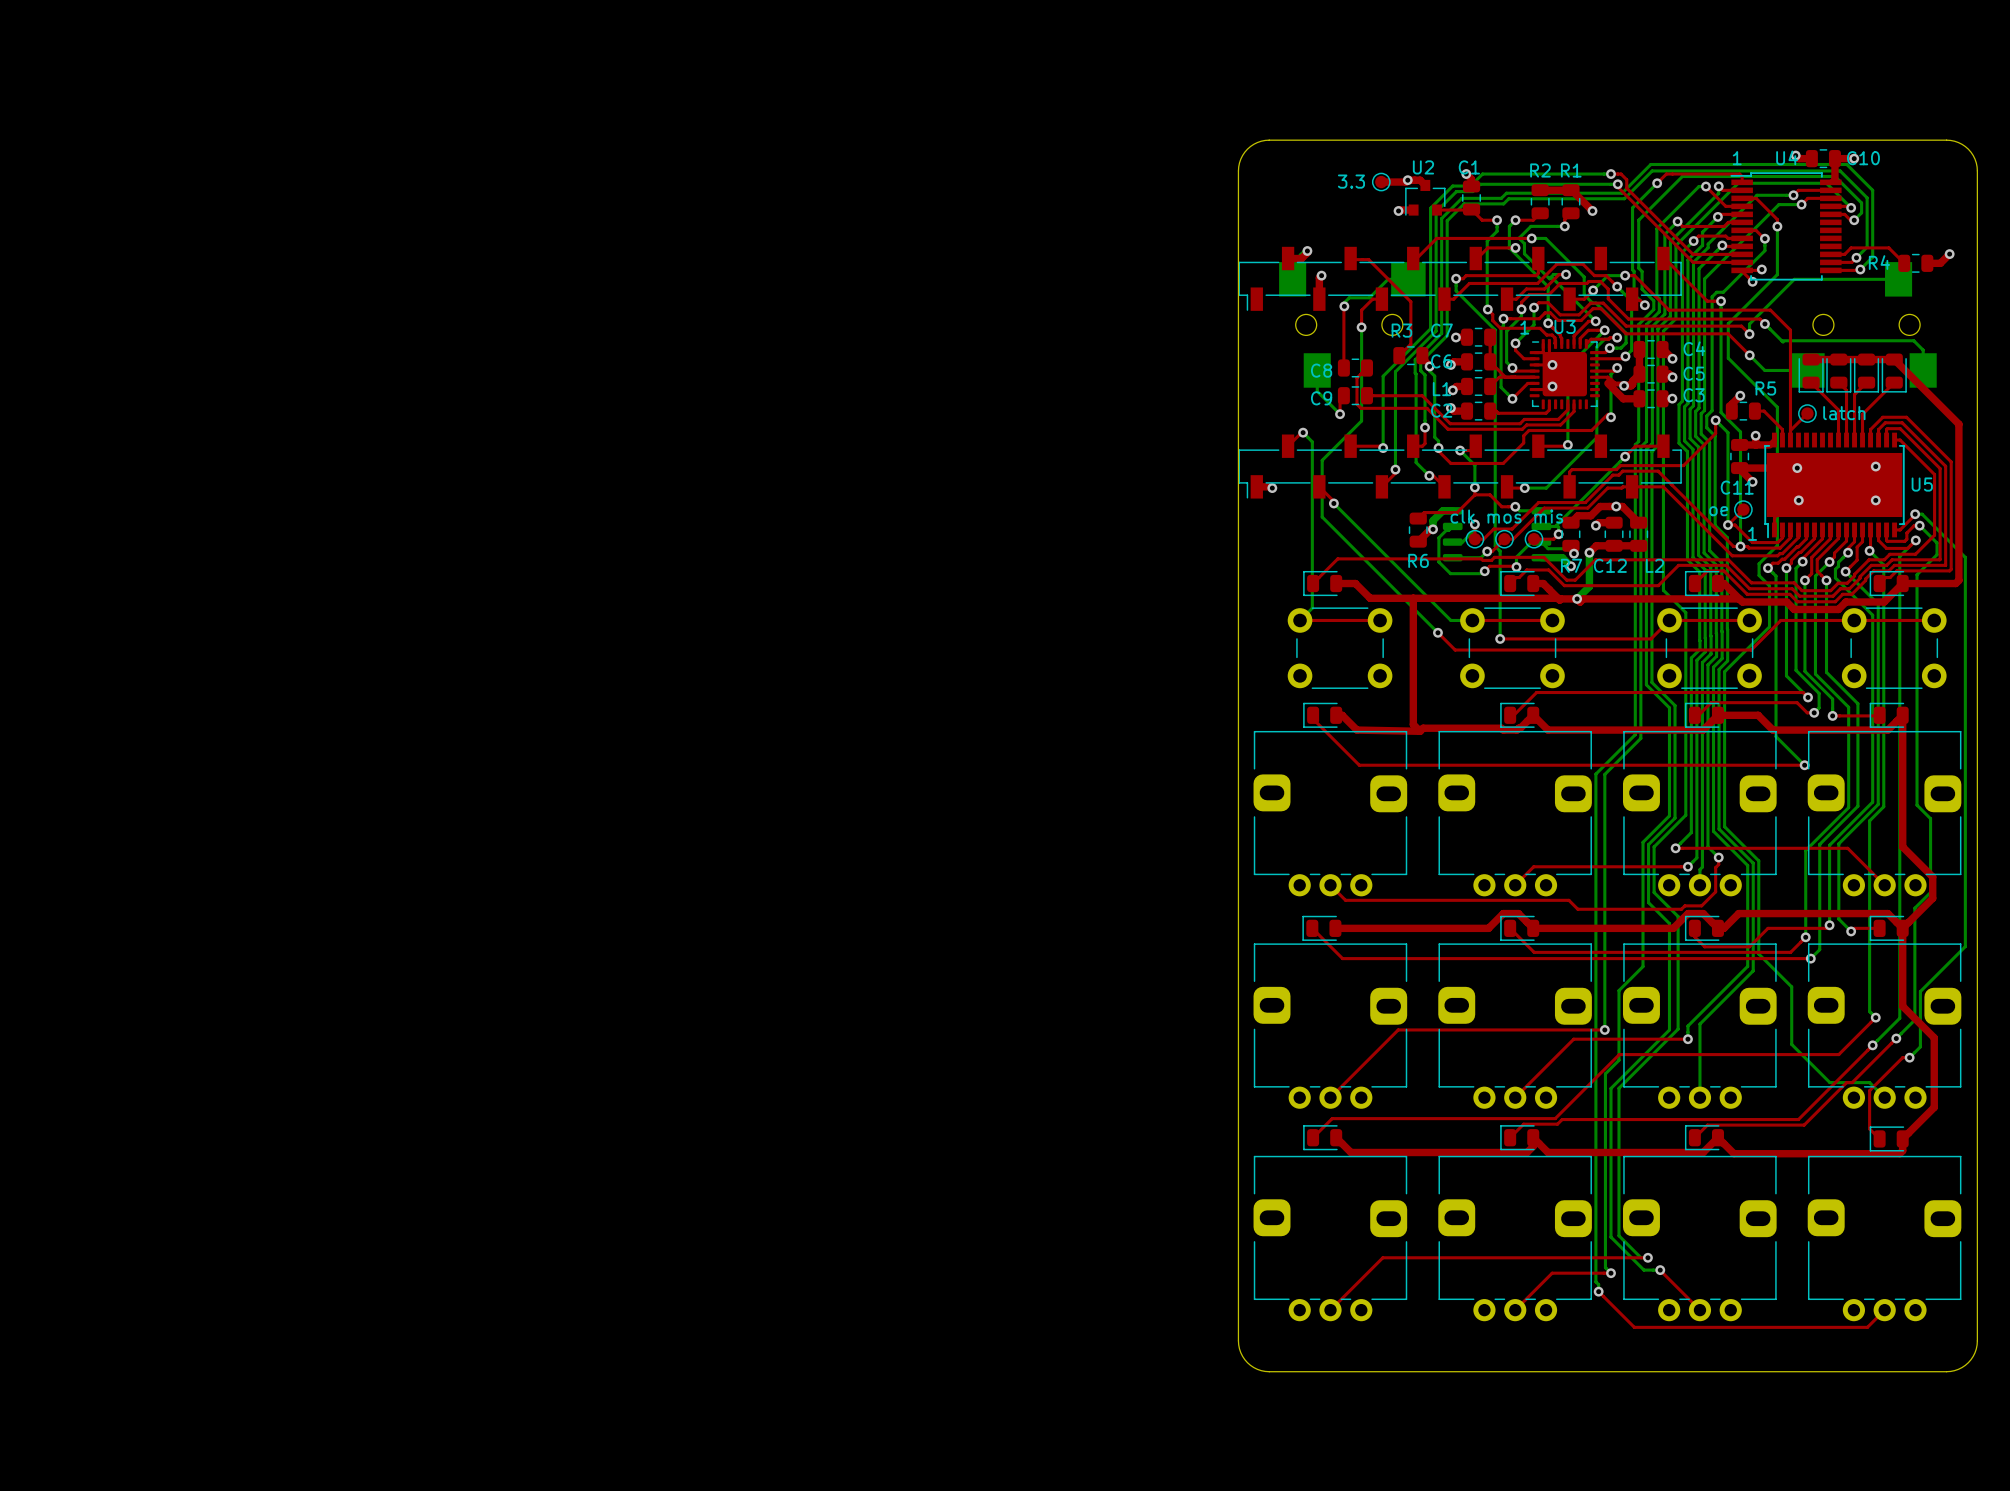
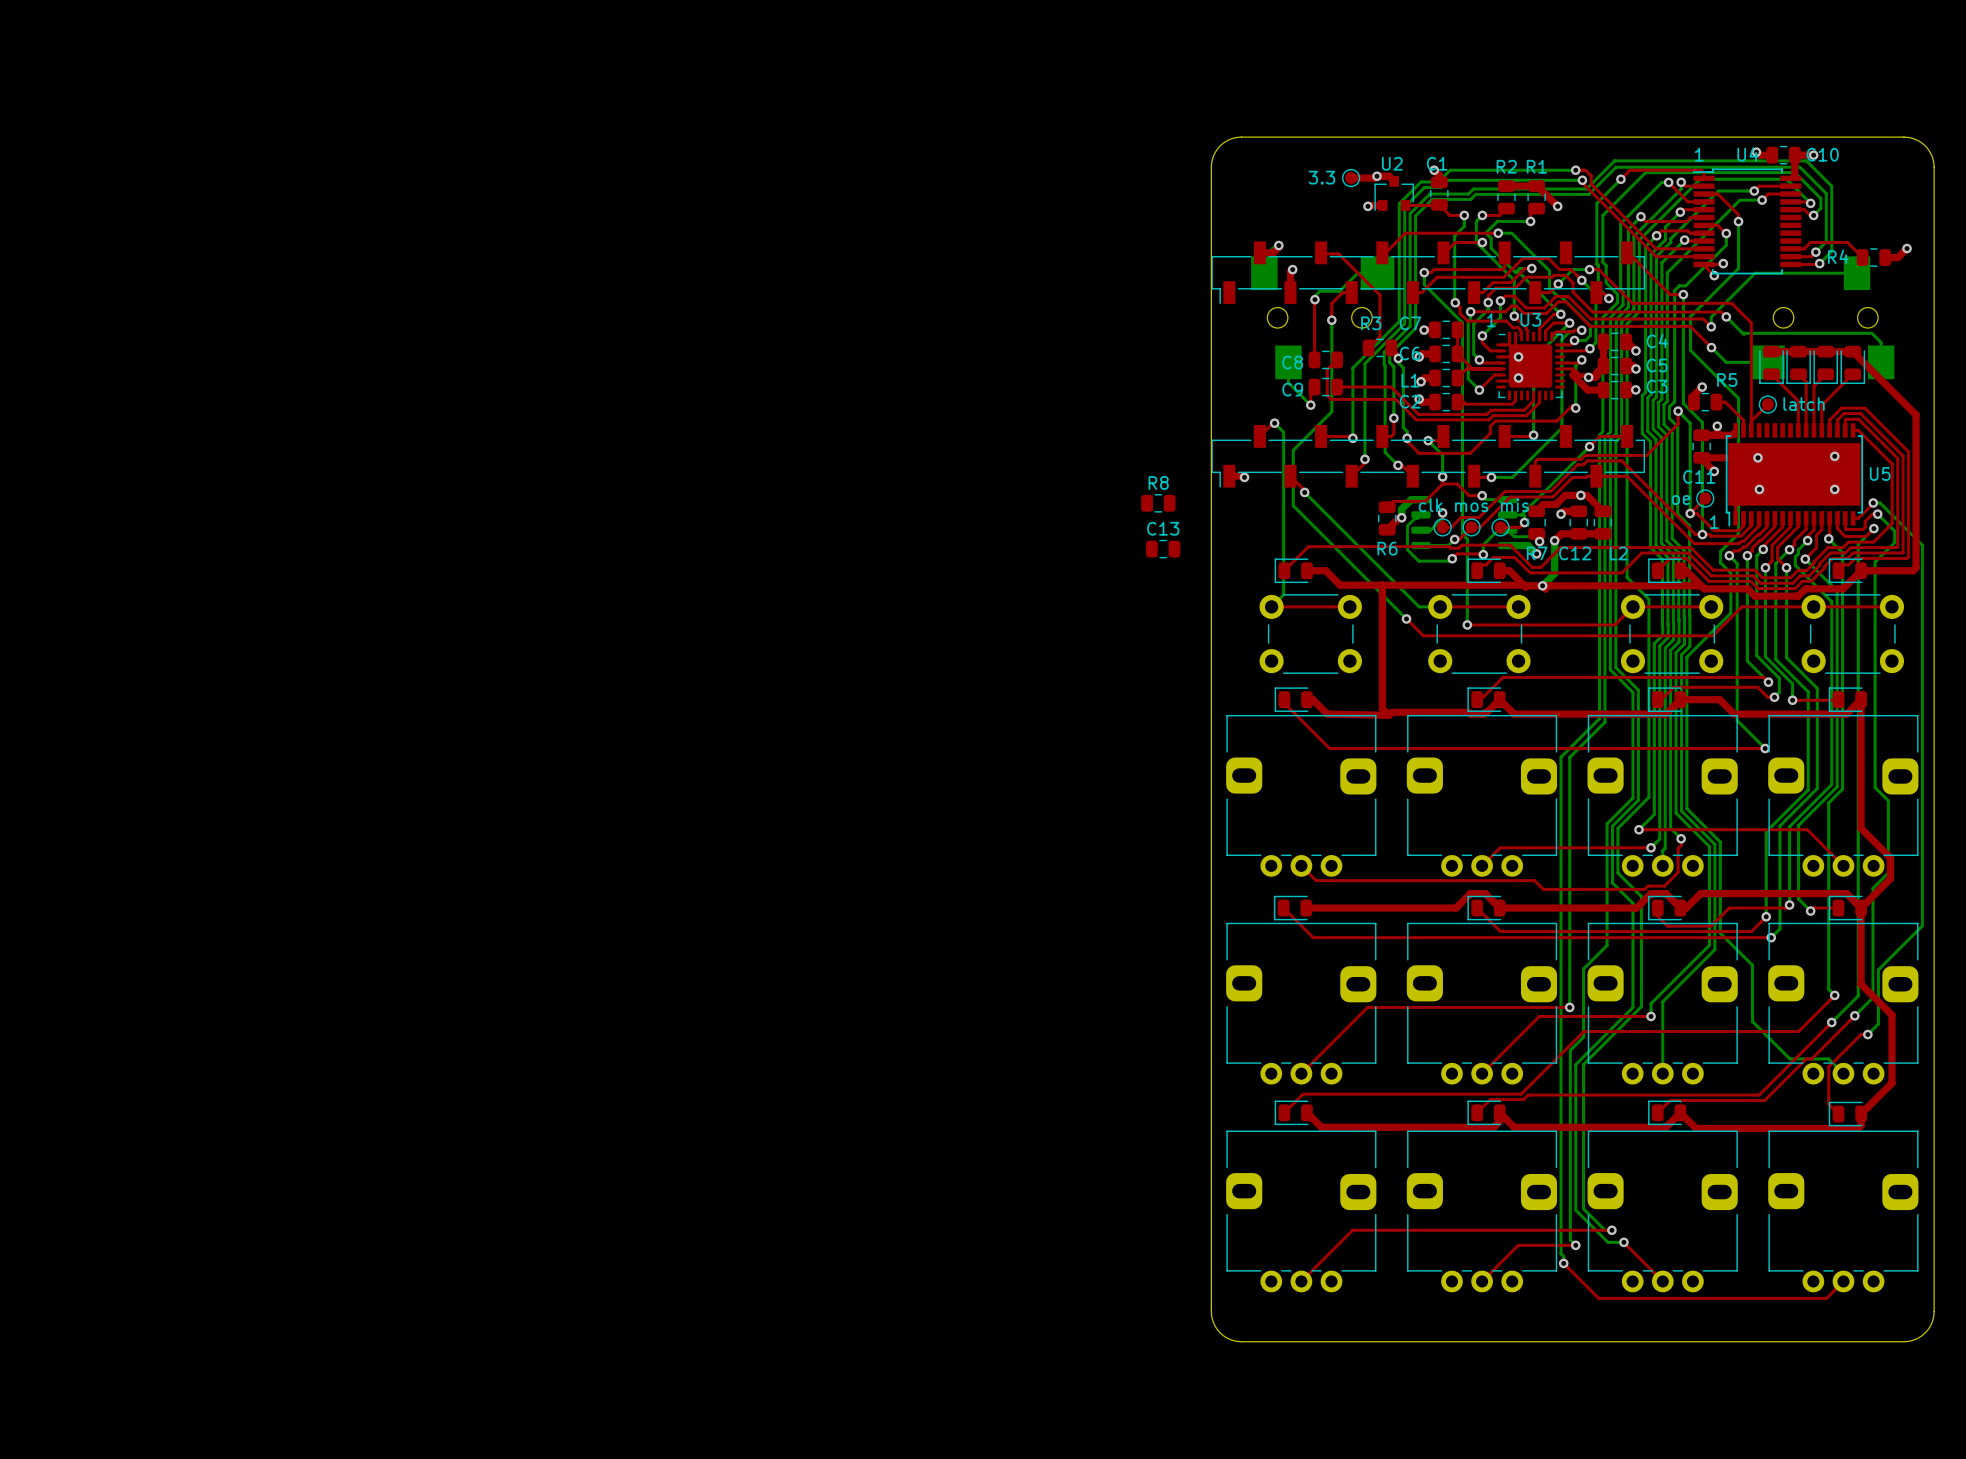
R8: none -> (1158, 503)
C13: none -> (1163, 549)

